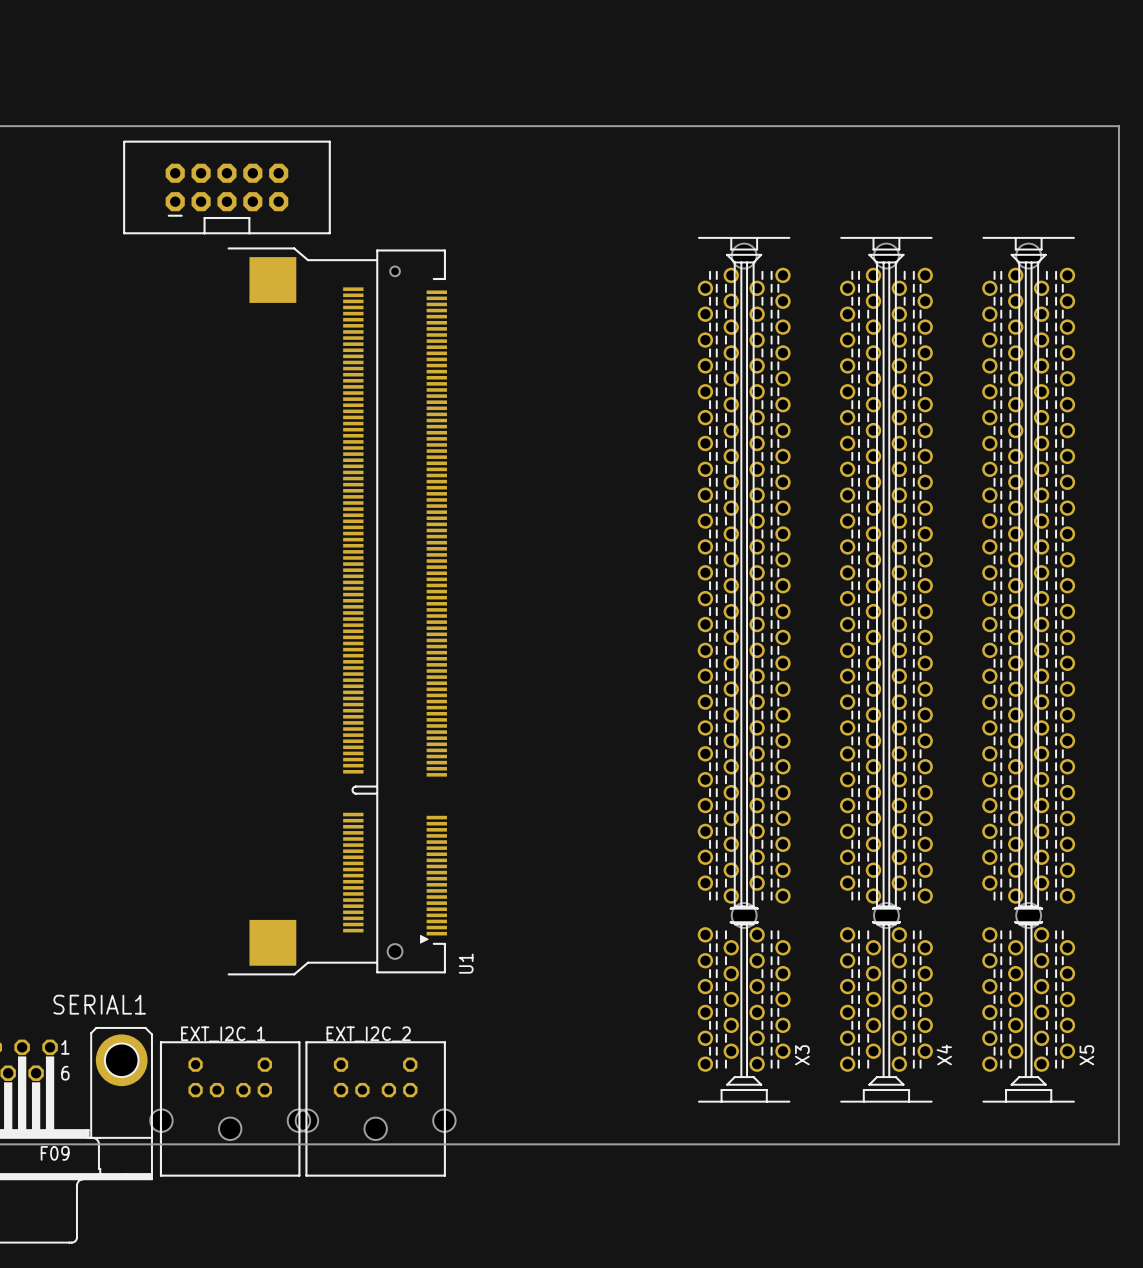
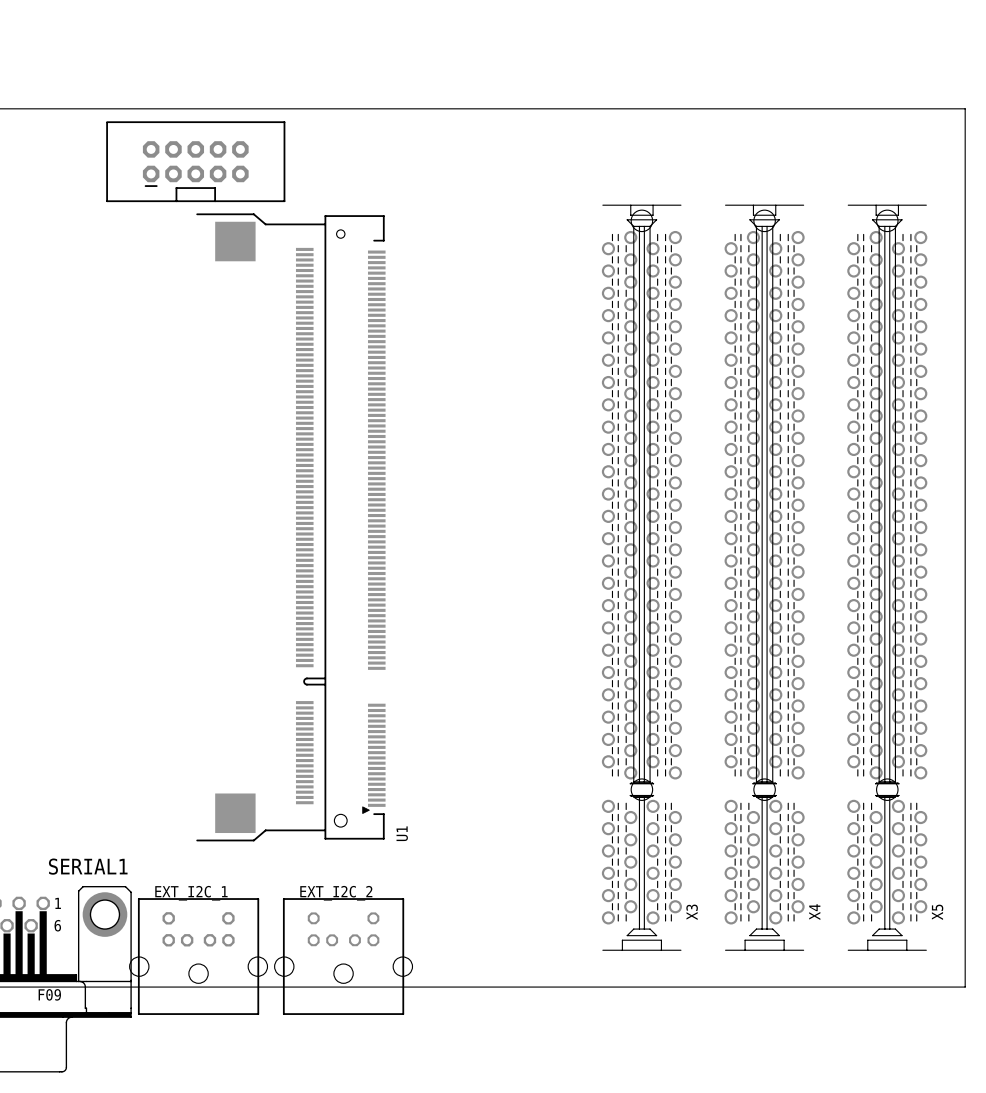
EXT_I2C_2 footprint: [295, 1041, 456, 1177] -> [274, 898, 413, 1015]

